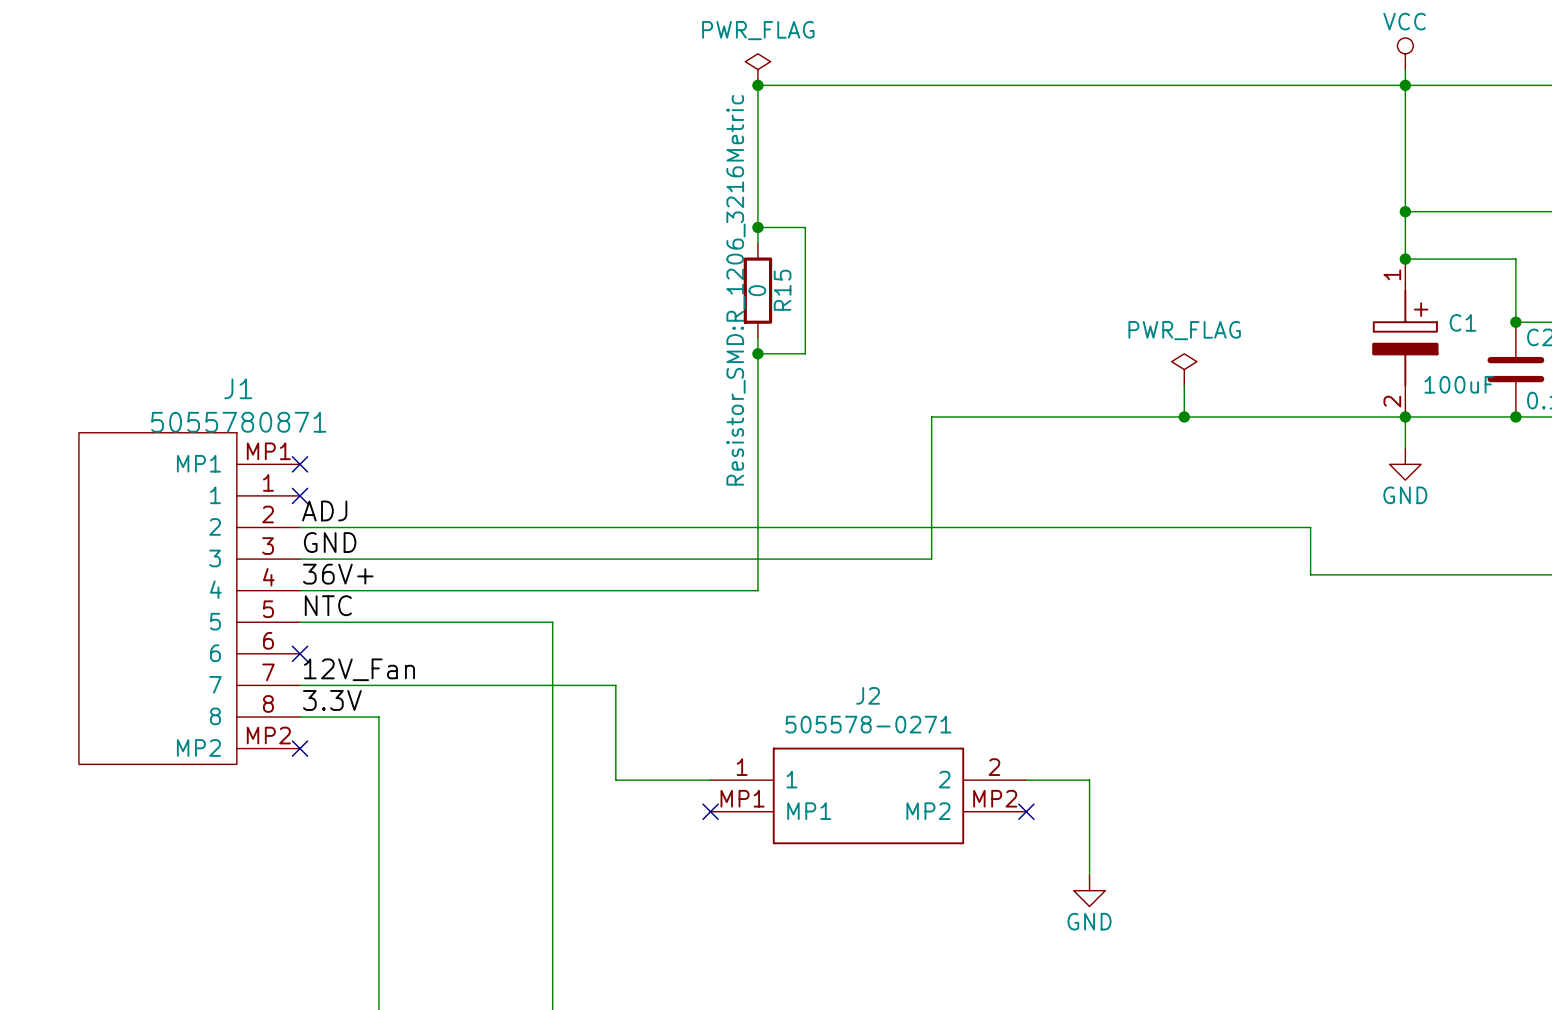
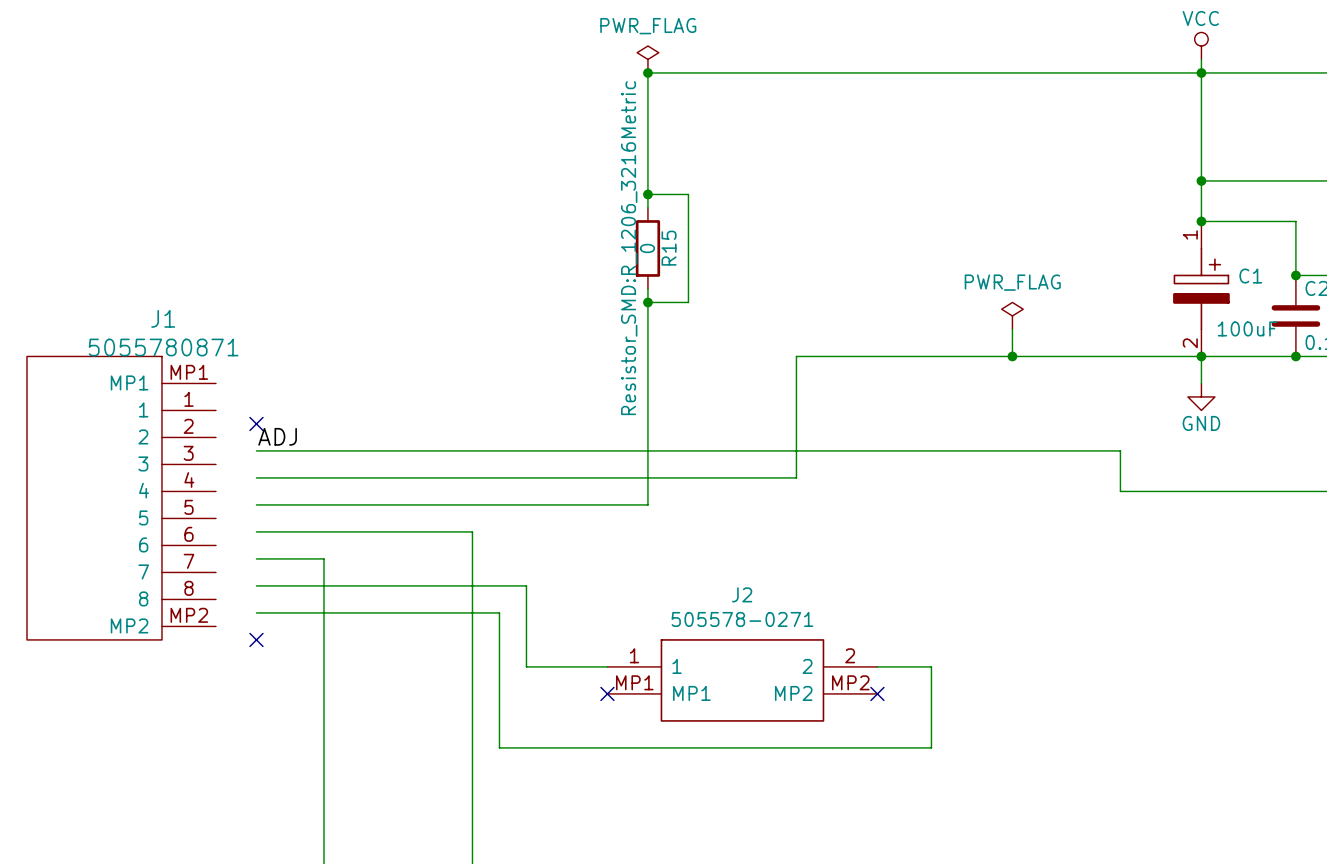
no-connect mark: (300, 464) -> none
label: GND (330, 542) -> none
label: 36V+ (338, 574) -> none
J1 position: (189, 598) -> (121, 498)
label: NTC (328, 605) -> none
wire: none -> (256, 558) (323, 558) (323, 612) (499, 612) (499, 747) (931, 747)
no-connect mark: (300, 653) -> none
label: 12V_Fan (359, 669) -> none
label: 3.3V (332, 700) -> none
power symbol: GND (1089, 890) -> none

